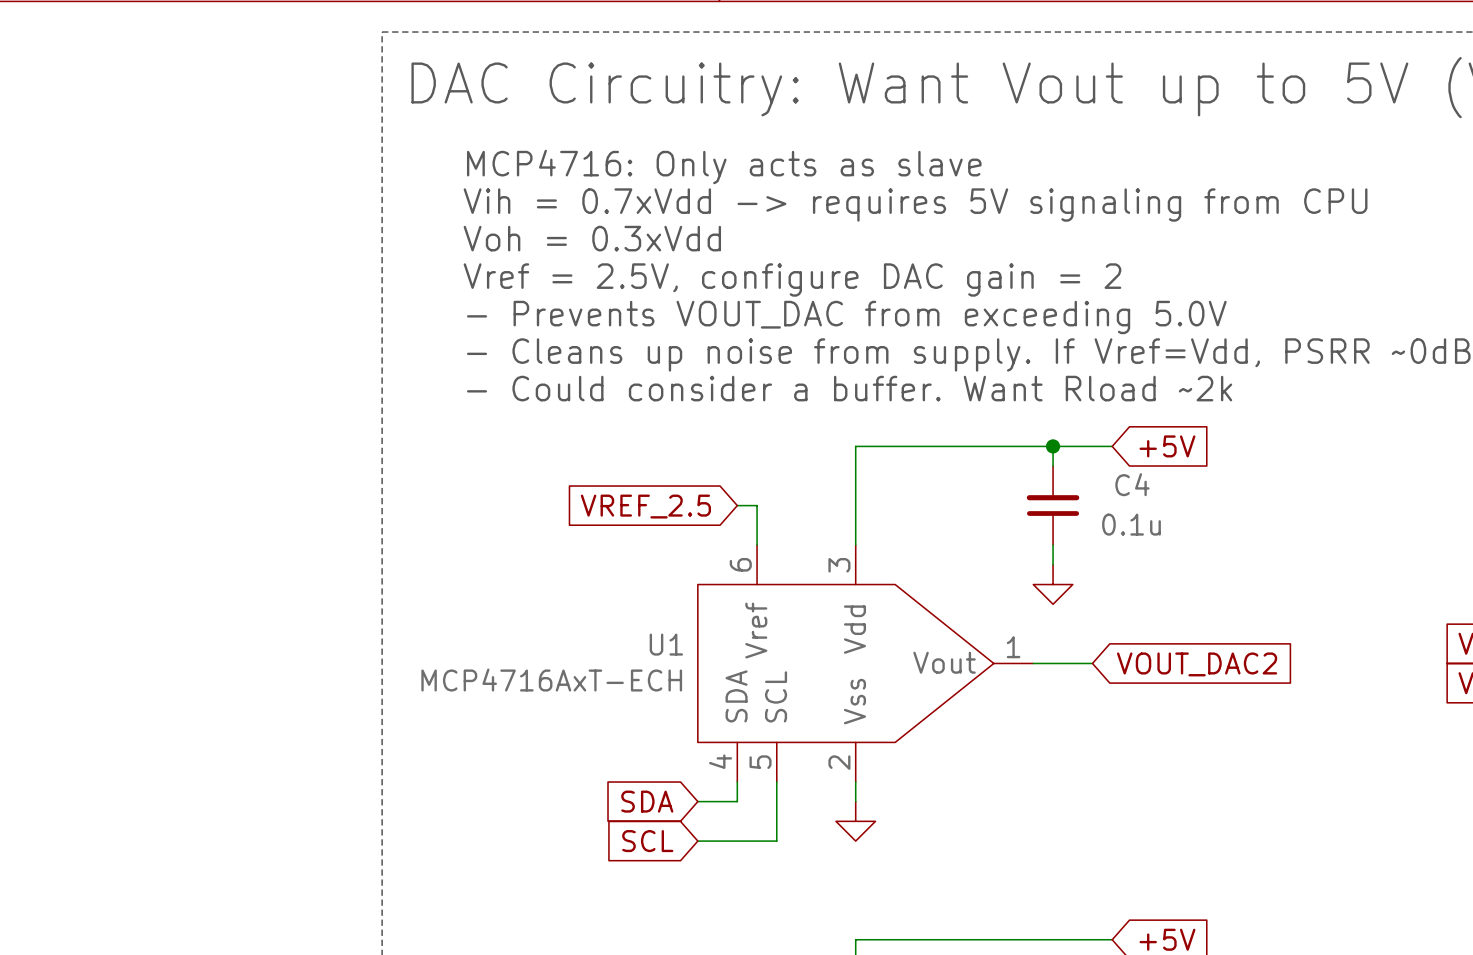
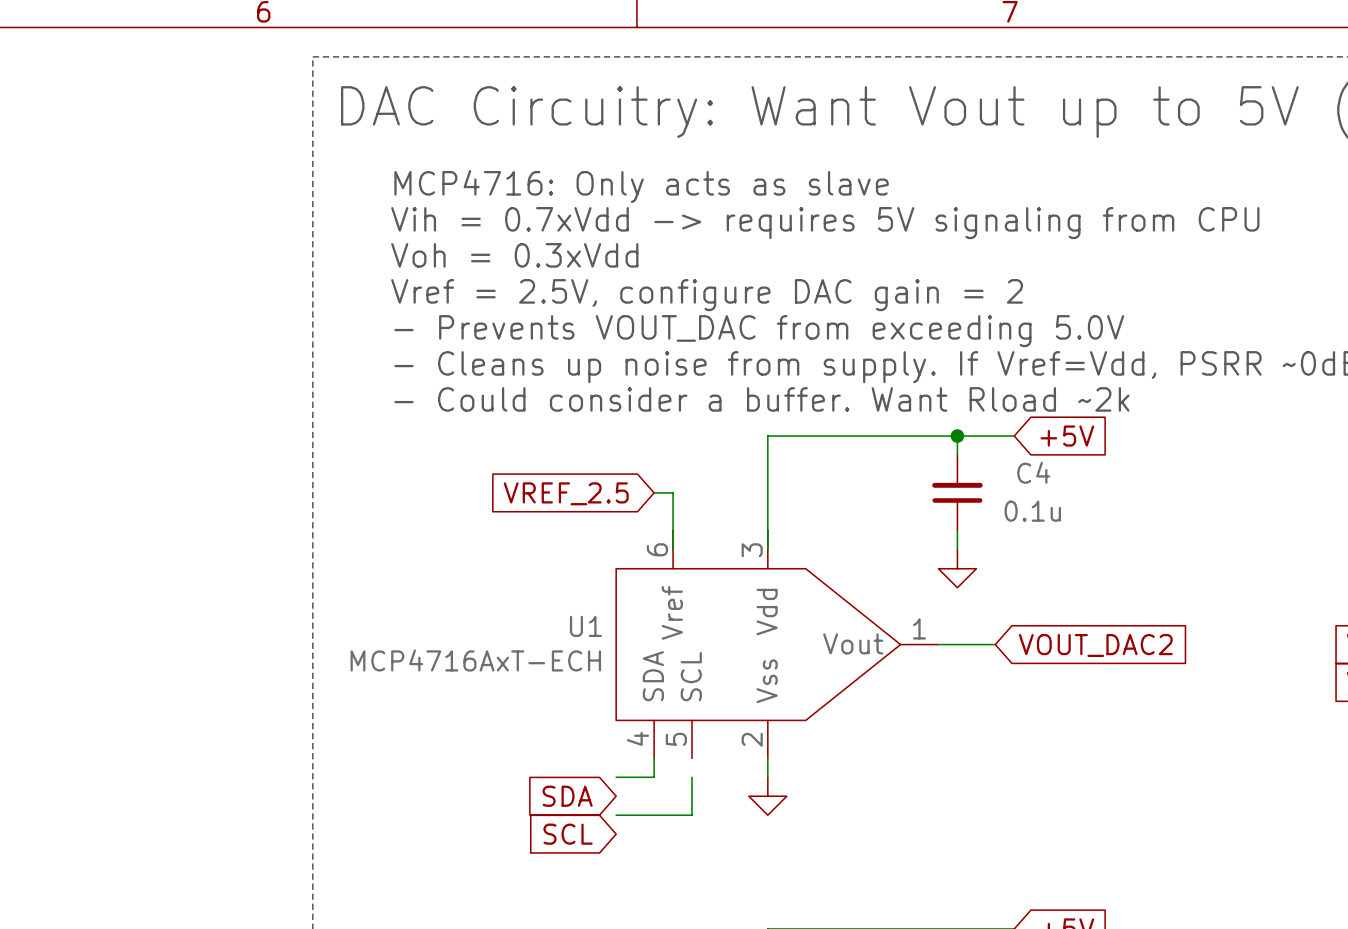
wire: (855, 446) (1112, 446) -> (767, 454) (767, 436) (1014, 436)
junction position: (1053, 446) -> (957, 436)
global label position: +5V (1167, 446) -> +5V (1067, 436)
wire: (737, 505) (757, 505) -> (654, 492) (673, 492) (673, 511)
C4 position: (1053, 505) -> (957, 492)
global label position: VREF_2.5 (645, 506) -> VREF_2.5 (566, 493)
power symbol position: (1053, 584) -> (957, 568)
U1 position: (865, 663) -> (777, 644)
wire: (1033, 663) (1092, 663) -> (938, 644) (995, 644)
global label position: VOUT_DAC2 (1197, 664) -> VOUT_DAC2 (1095, 645)
wire: (737, 781) (737, 801) (697, 801) -> (654, 758) (654, 777) (616, 777)
wire: (776, 821) (776, 841) (697, 841) -> (692, 815) (616, 815)
power symbol position: (855, 821) -> (767, 796)

